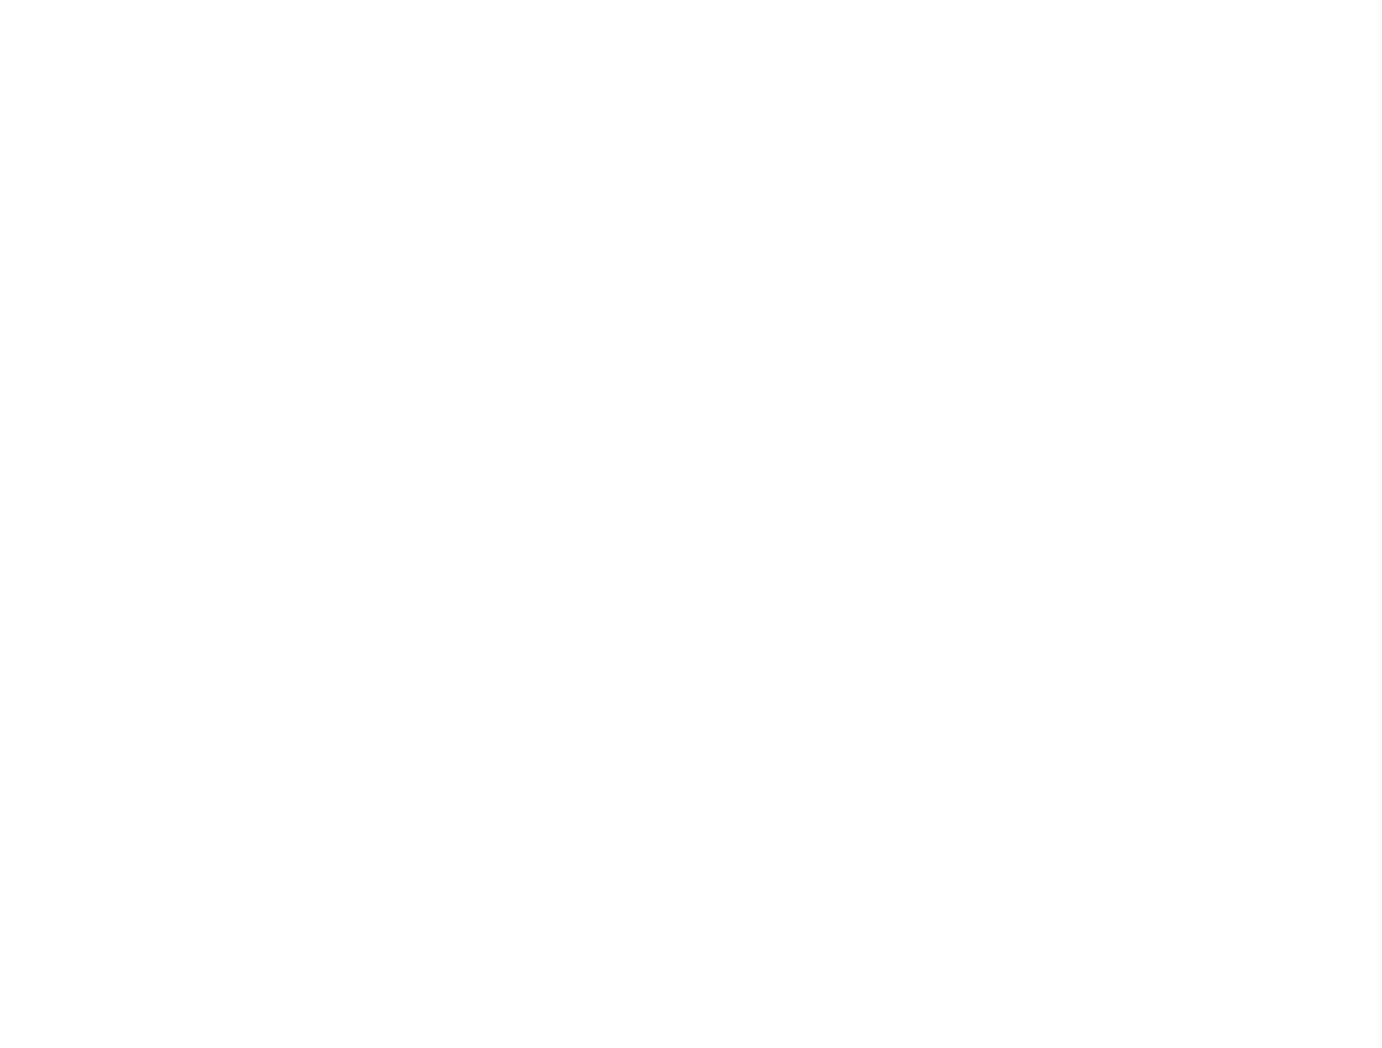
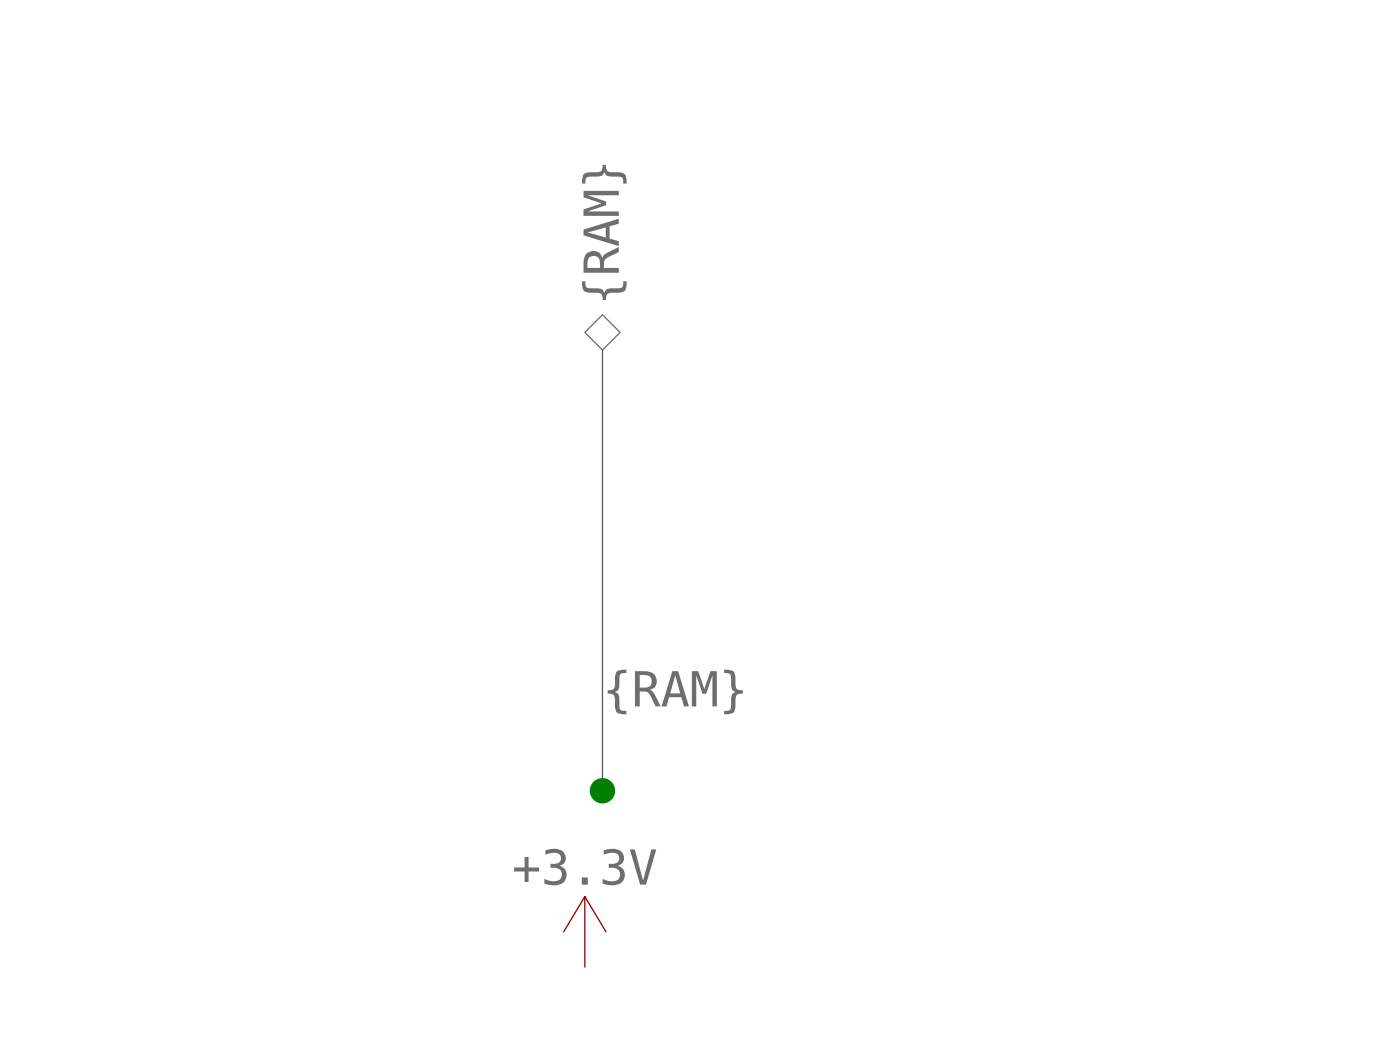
hierarchical label: none -> {RAM} (604, 232)
bus: none -> (602, 350) (602, 790)
label: none -> {RAM} (675, 691)
junction: none -> (602, 790)
power symbol: none -> +3.3V (584, 931)

